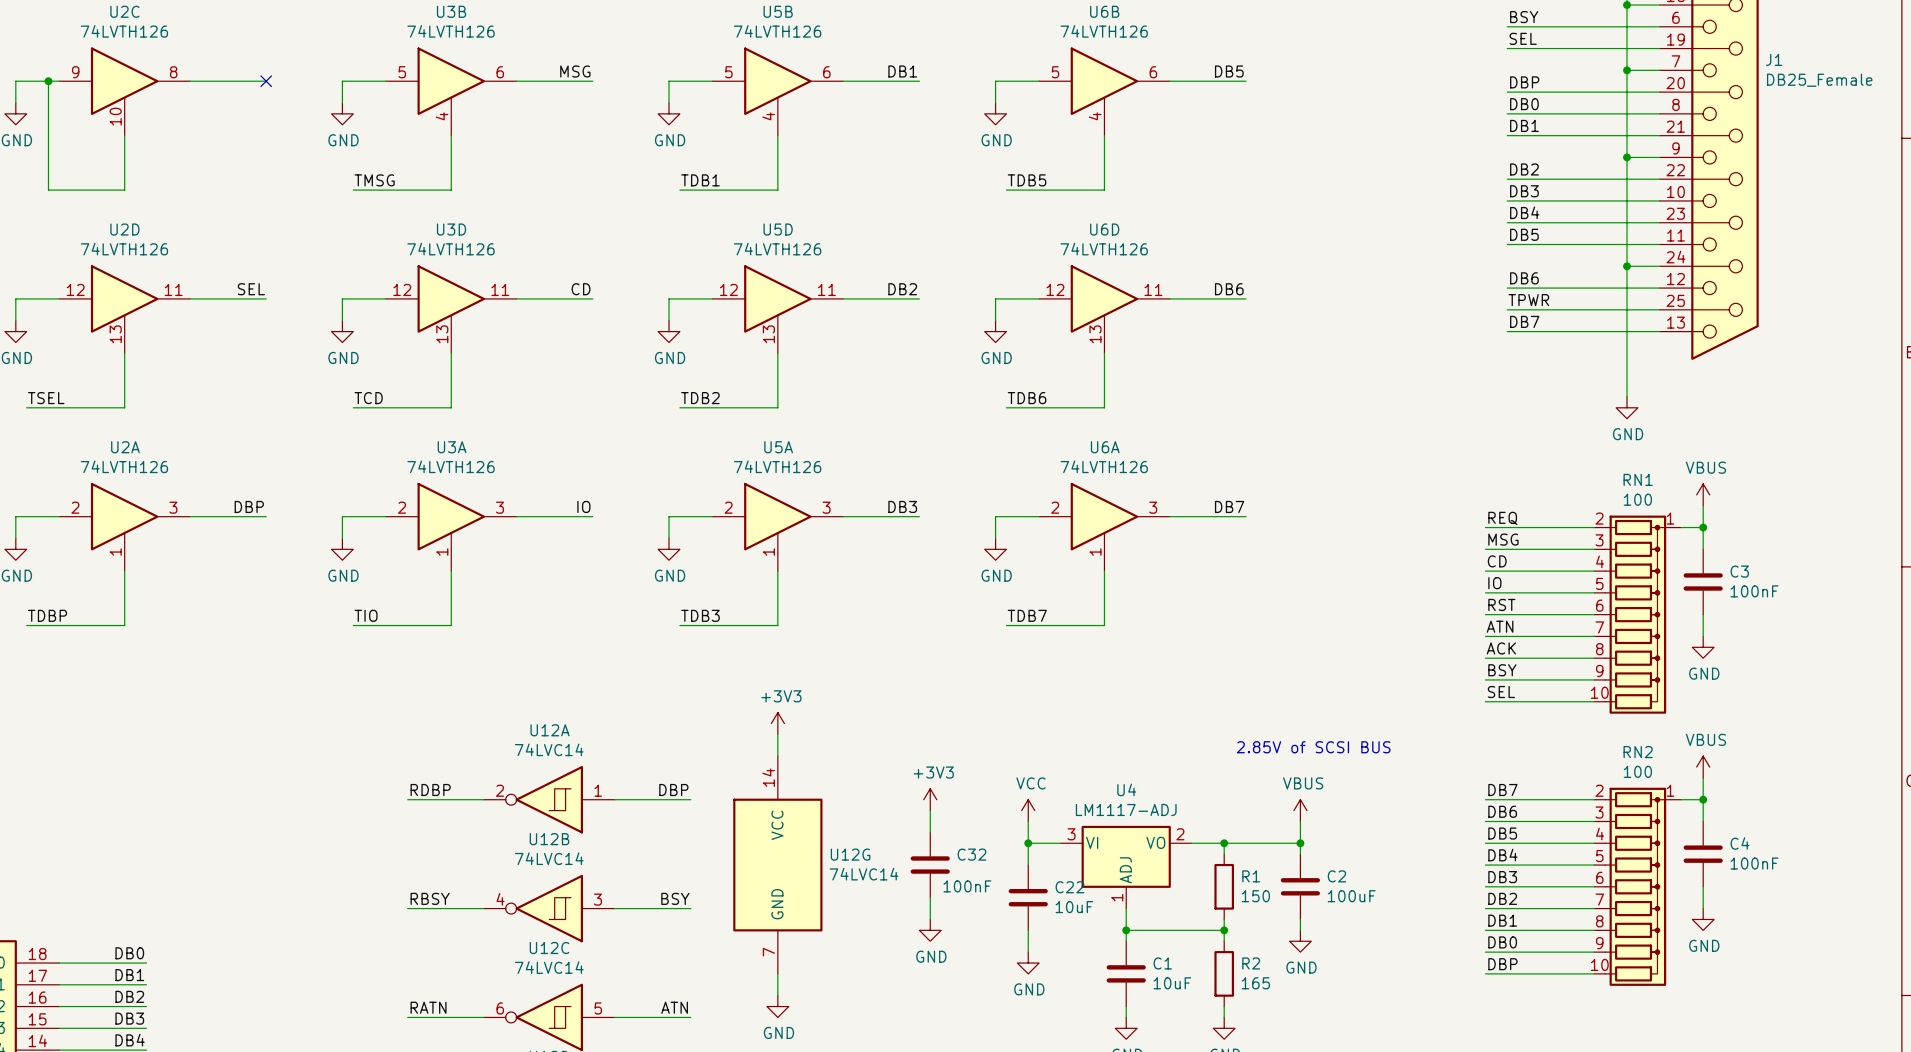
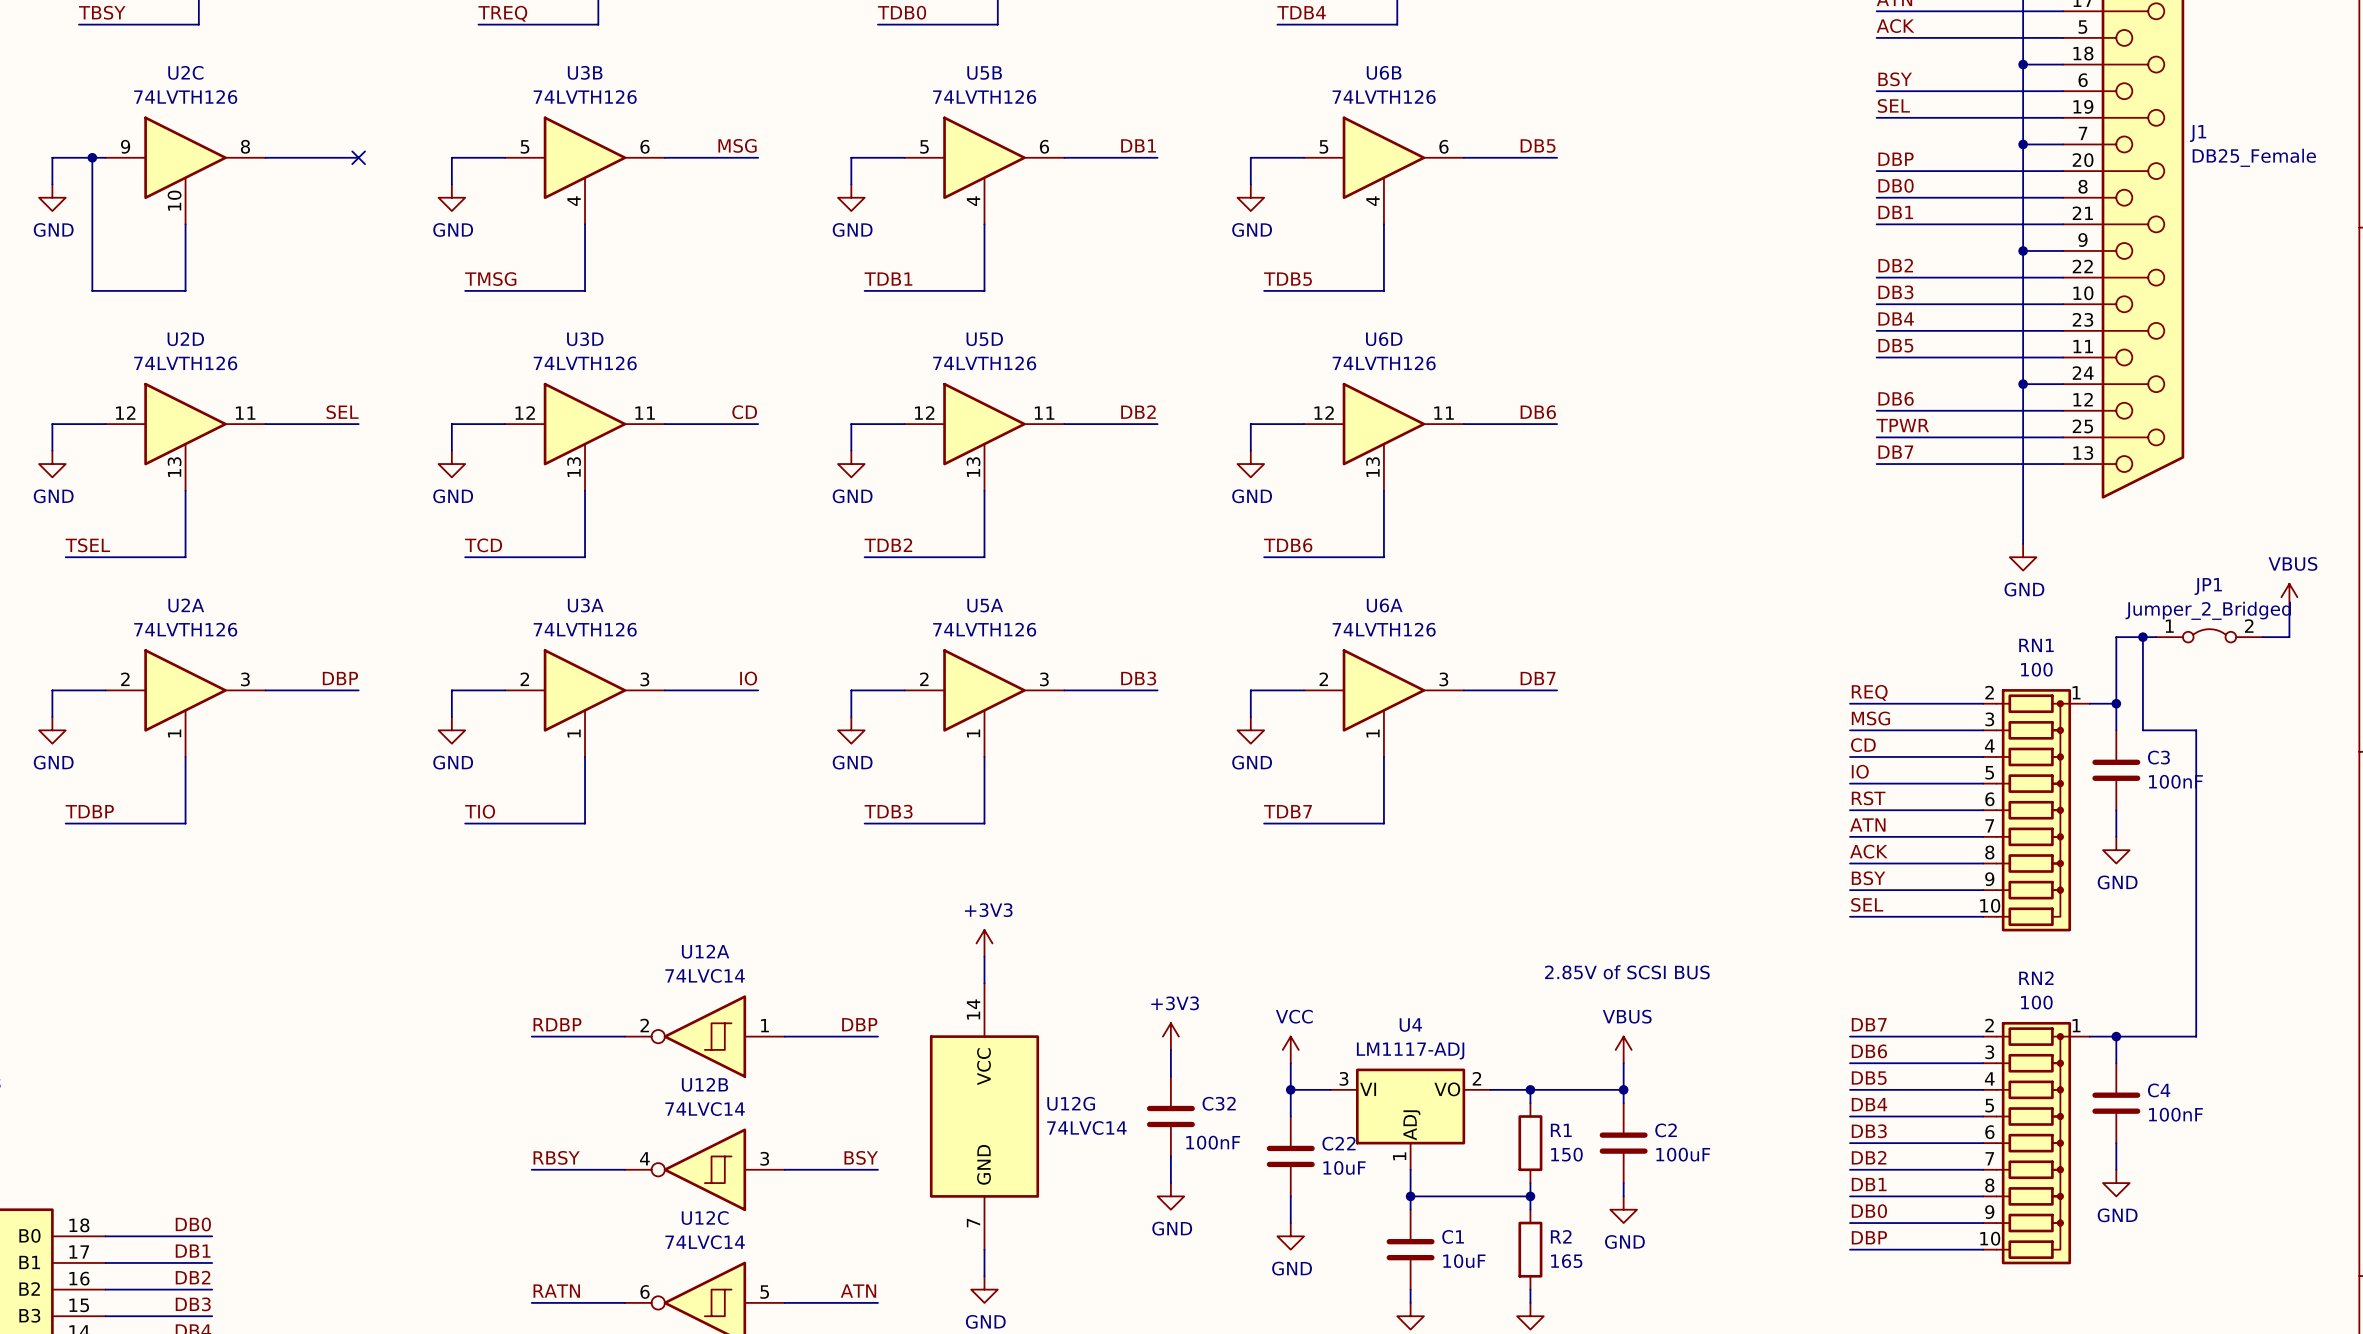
wire: none -> (2289, 610) (2289, 637) (2262, 637)
JP1: none -> Jumper_2_Bridged (2209, 635)
junction: none -> (2142, 637)
wire: none -> (2156, 637) (2116, 637) (2116, 677)
power symbol position: VBUS (1703, 494) -> VBUS (2289, 597)
power symbol: VBUS (1703, 767) -> none
wire: (1703, 777) (1703, 799) -> (2142, 637) (2142, 730) (2196, 730) (2196, 1036) (2116, 1036)

